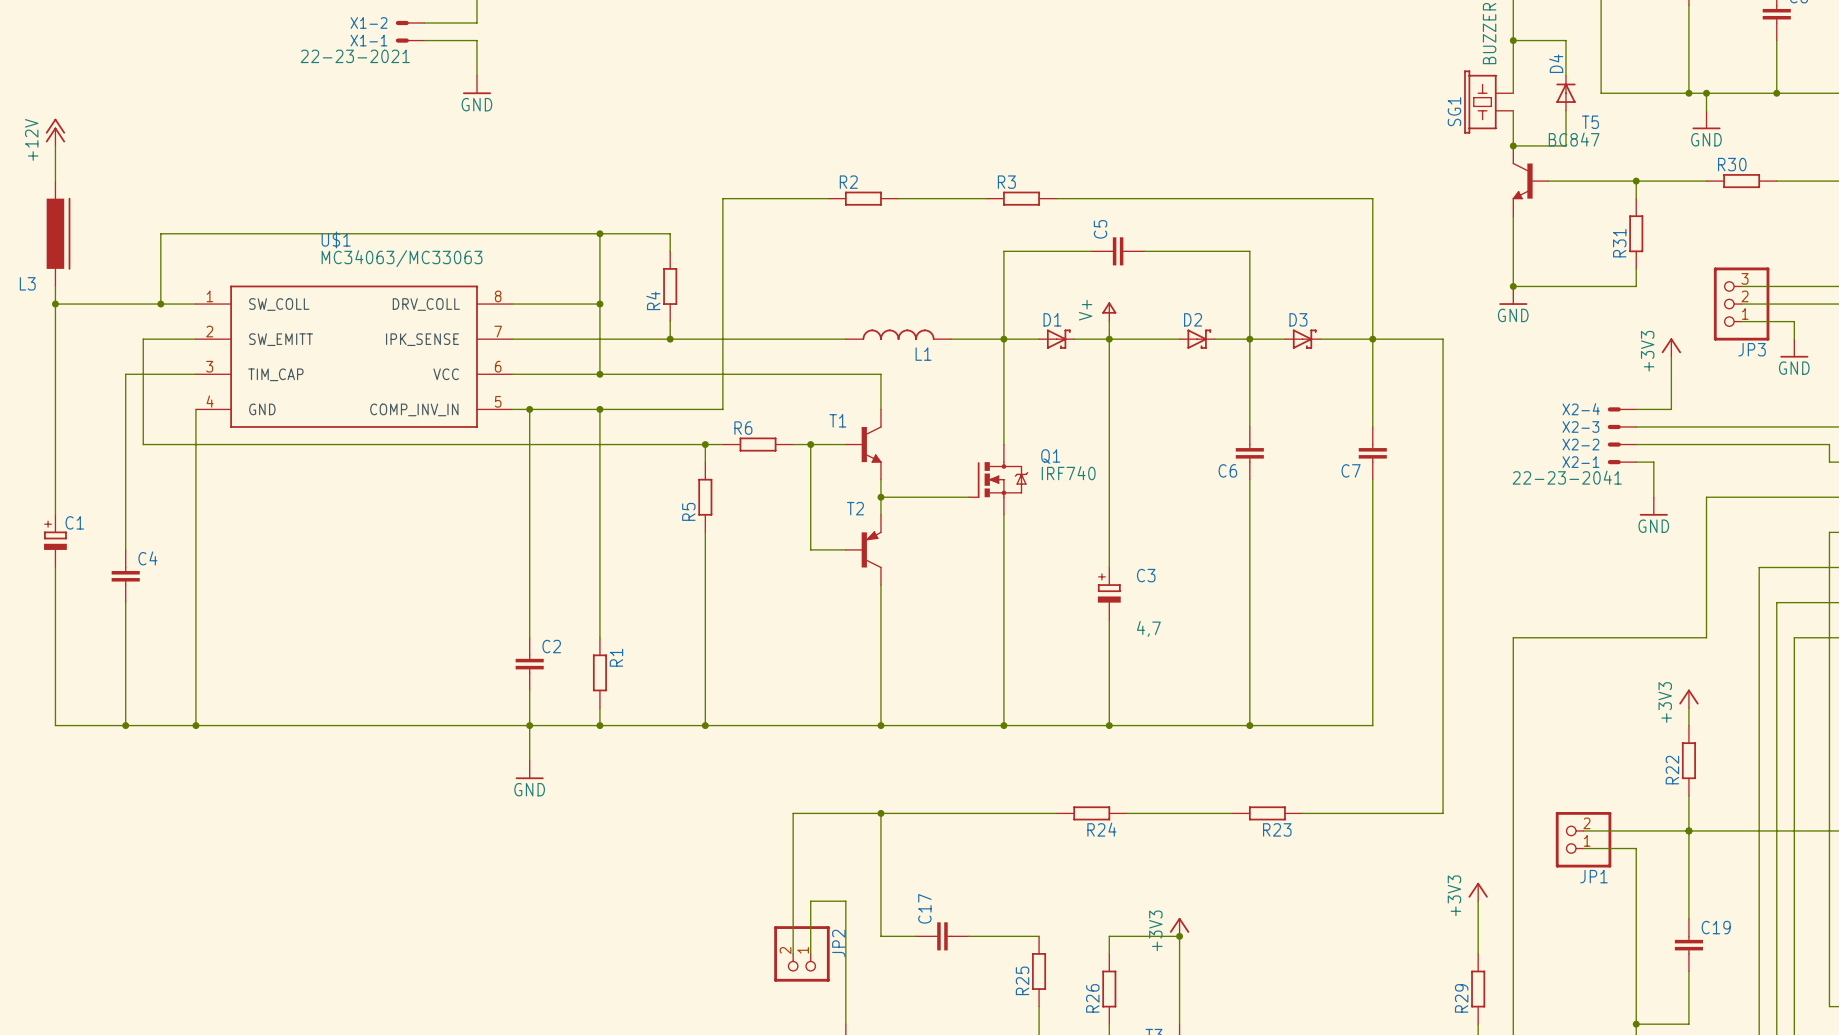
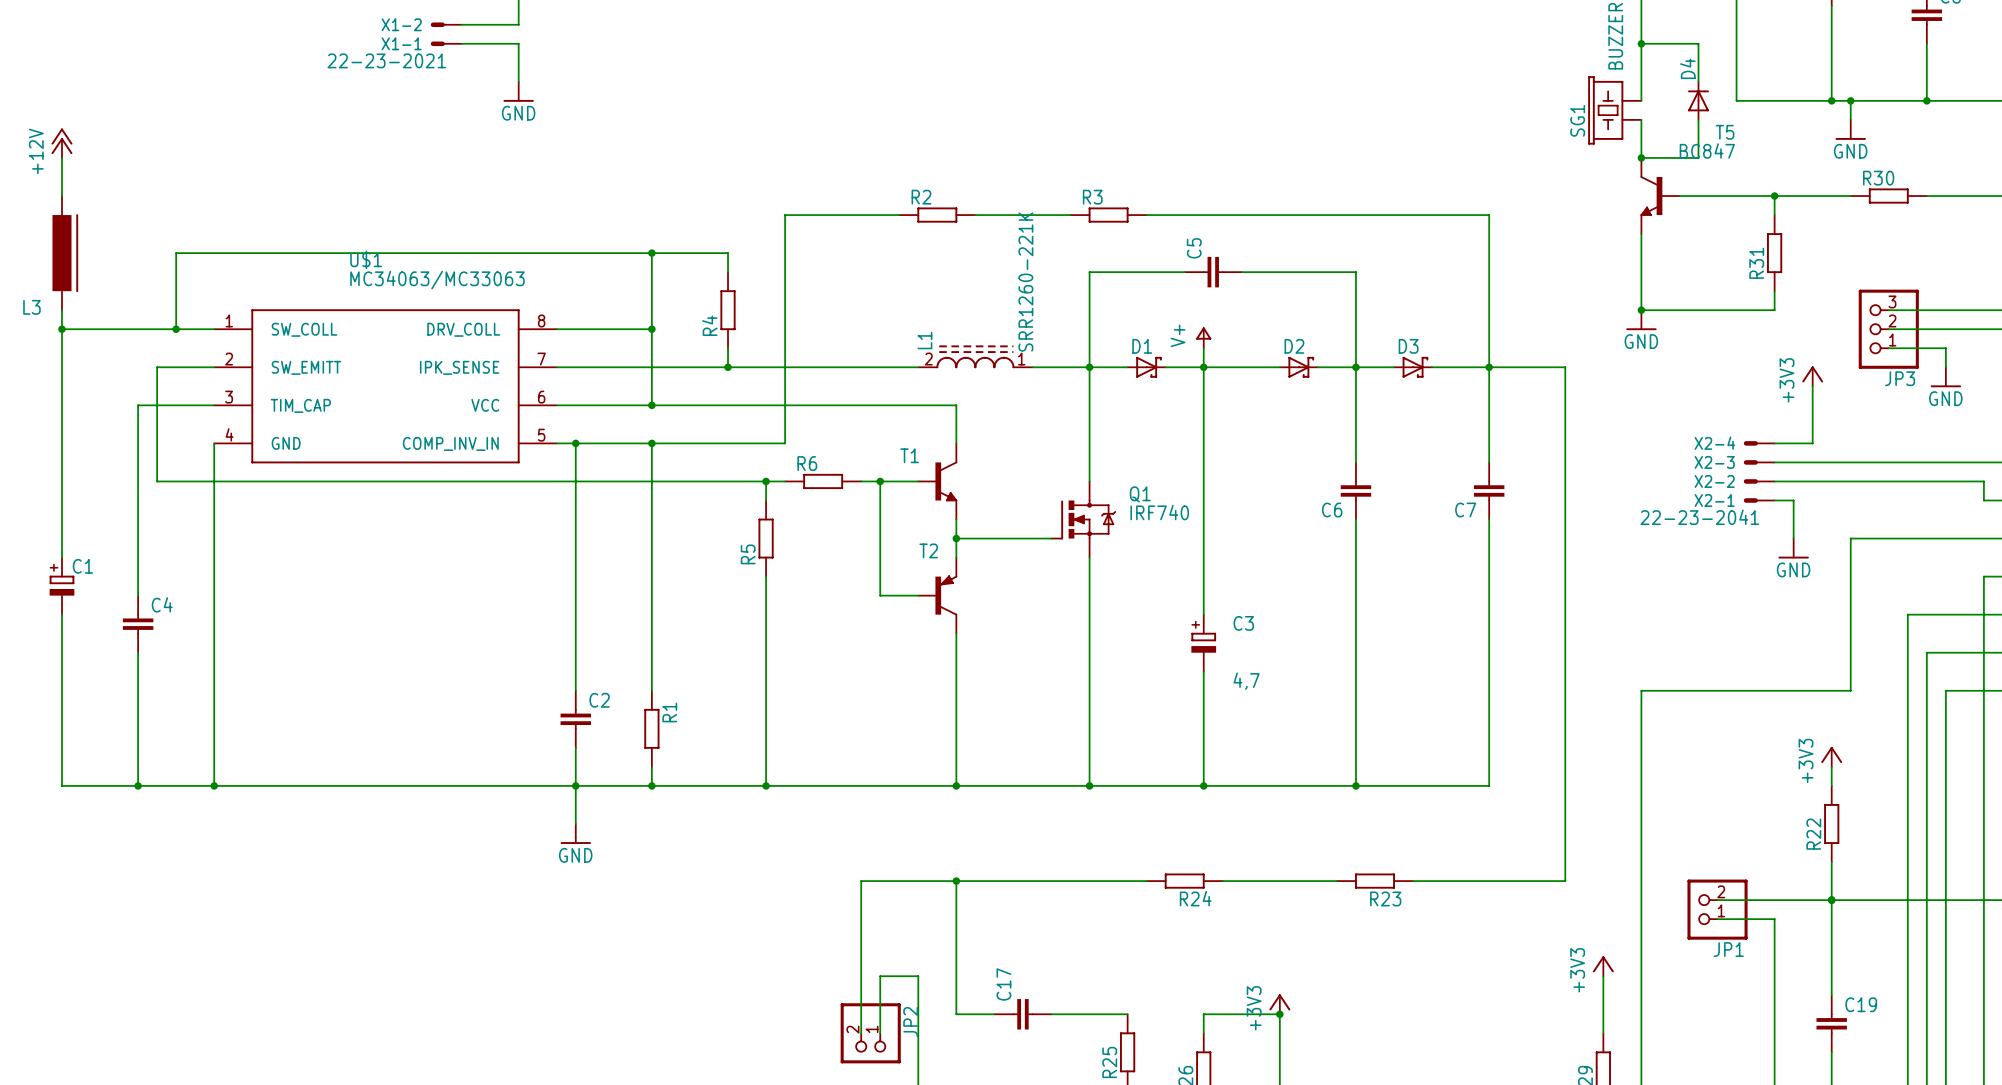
L1 value: none -> SRR1260-221K (1025, 282)
L1 symbol: [845, 329, 952, 341] -> [918, 345, 1033, 369]
L1 name position: L1 (923, 354) -> L1 (924, 340)

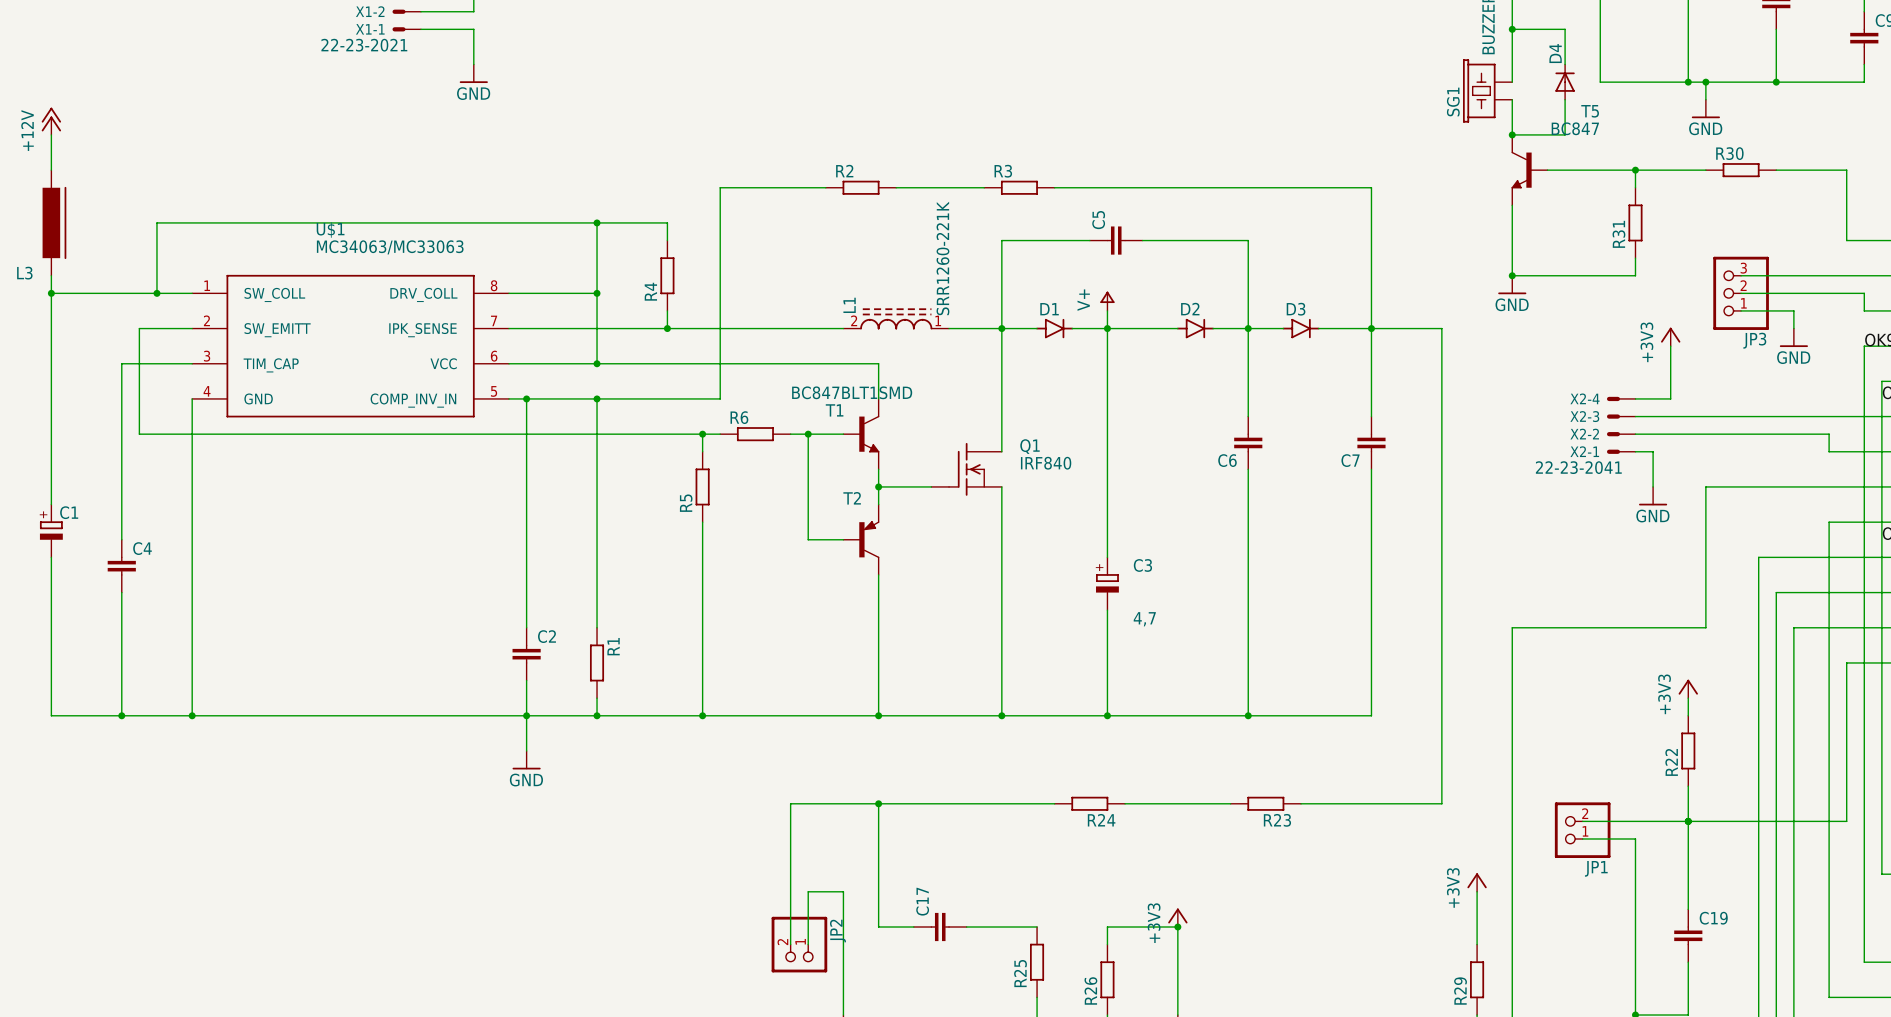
D1 symbol: [1127, 356, 1166, 378] -> [1036, 318, 1074, 339]
D2 symbol: [1279, 356, 1318, 378] -> [1176, 318, 1214, 339]
D3 symbol: [1394, 356, 1433, 378] -> [1282, 318, 1320, 339]
T1 value: none -> BC847BLT1SMD (852, 392)
Q1 symbol: [1050, 481, 1116, 558] -> [931, 442, 1002, 496]
Q1 value: IRF740 (1159, 512) -> IRF840 (1046, 463)

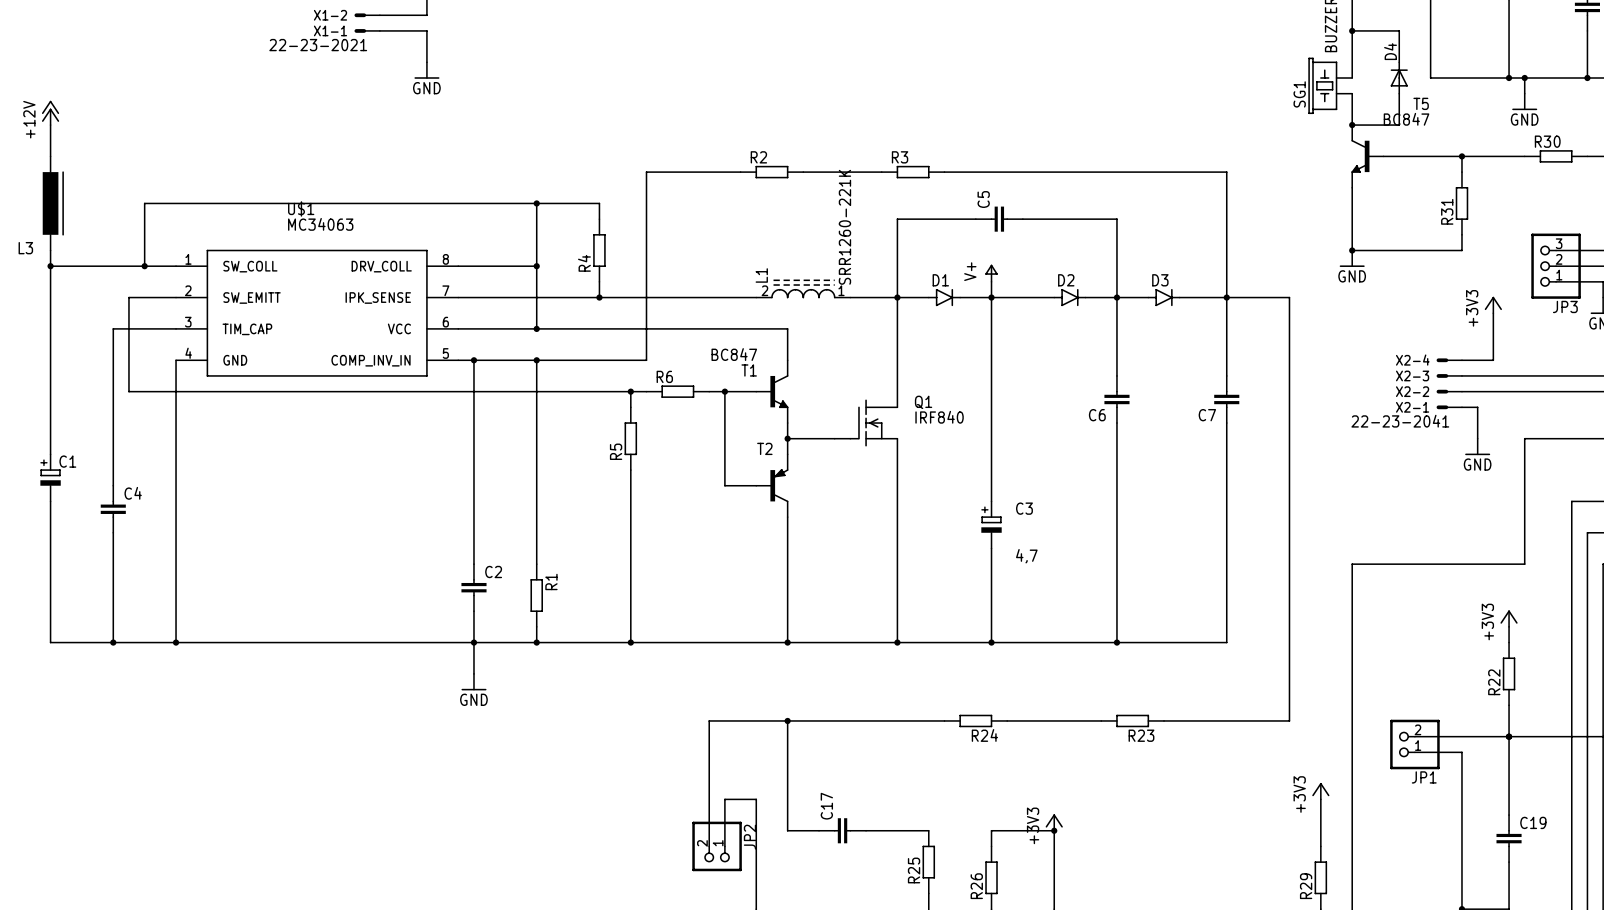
U$1 value: MC34063/MC33063 (390, 247) -> MC34063 (320, 224)
T1 value: BC847BLT1SMD (852, 392) -> BC847 (734, 354)

